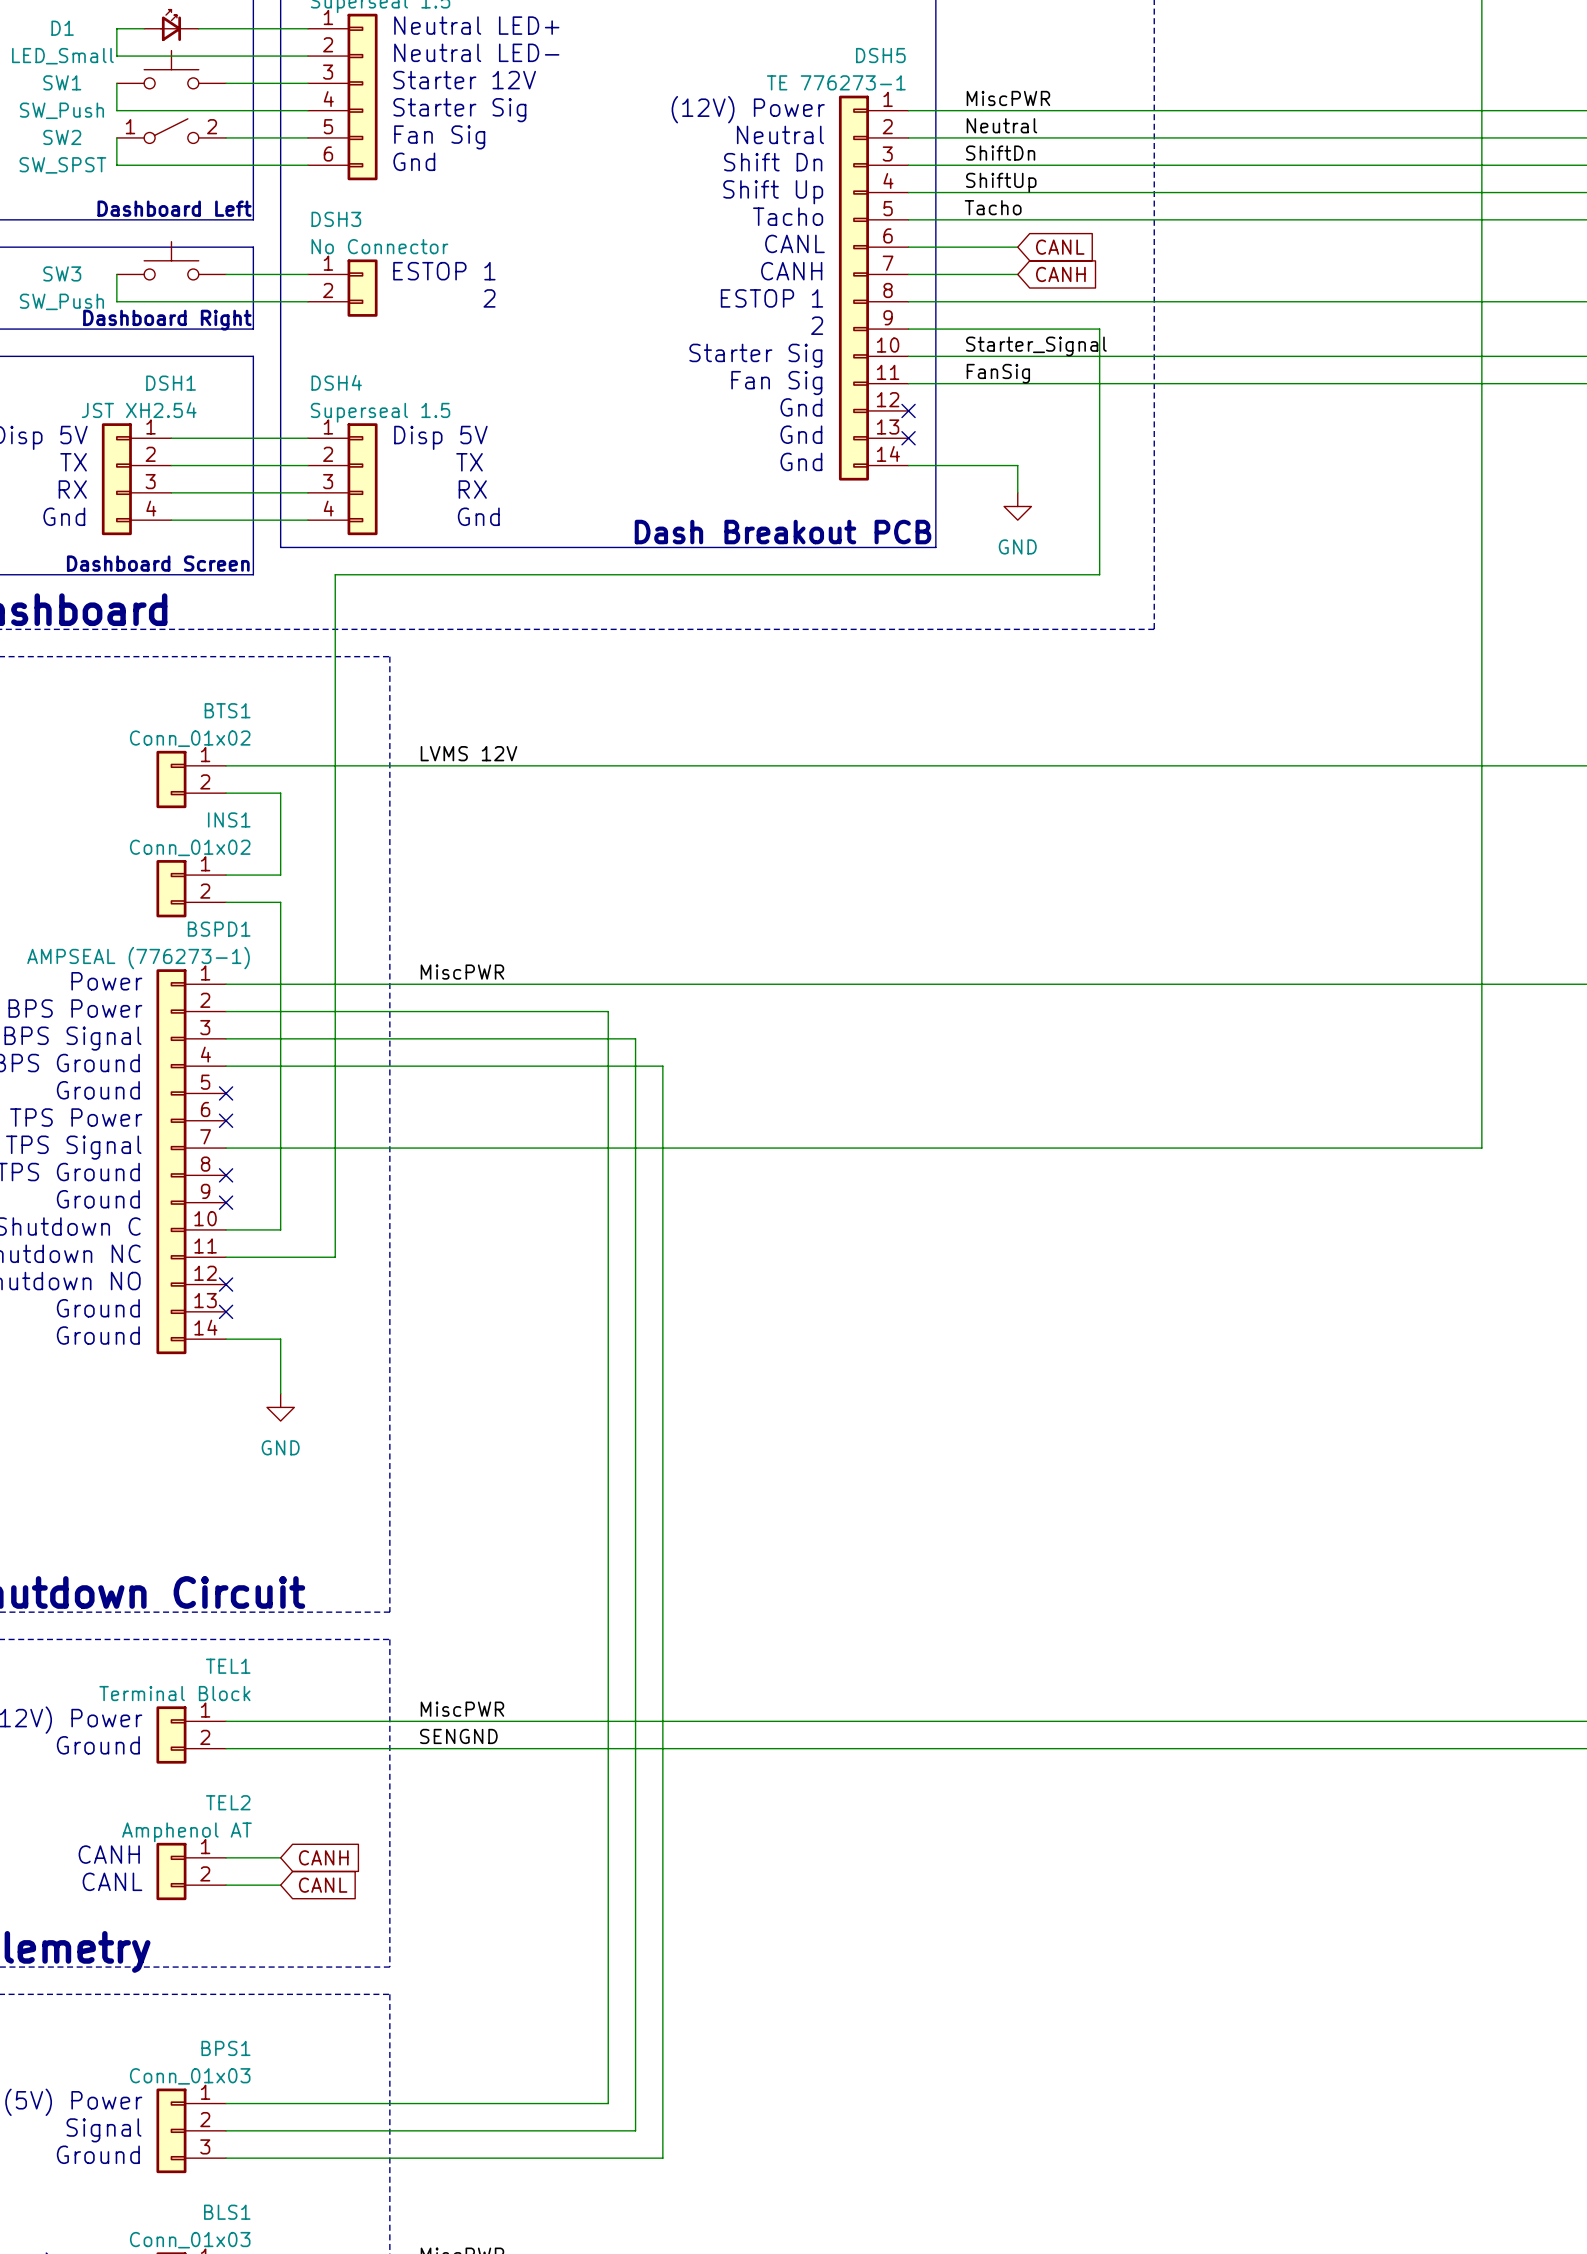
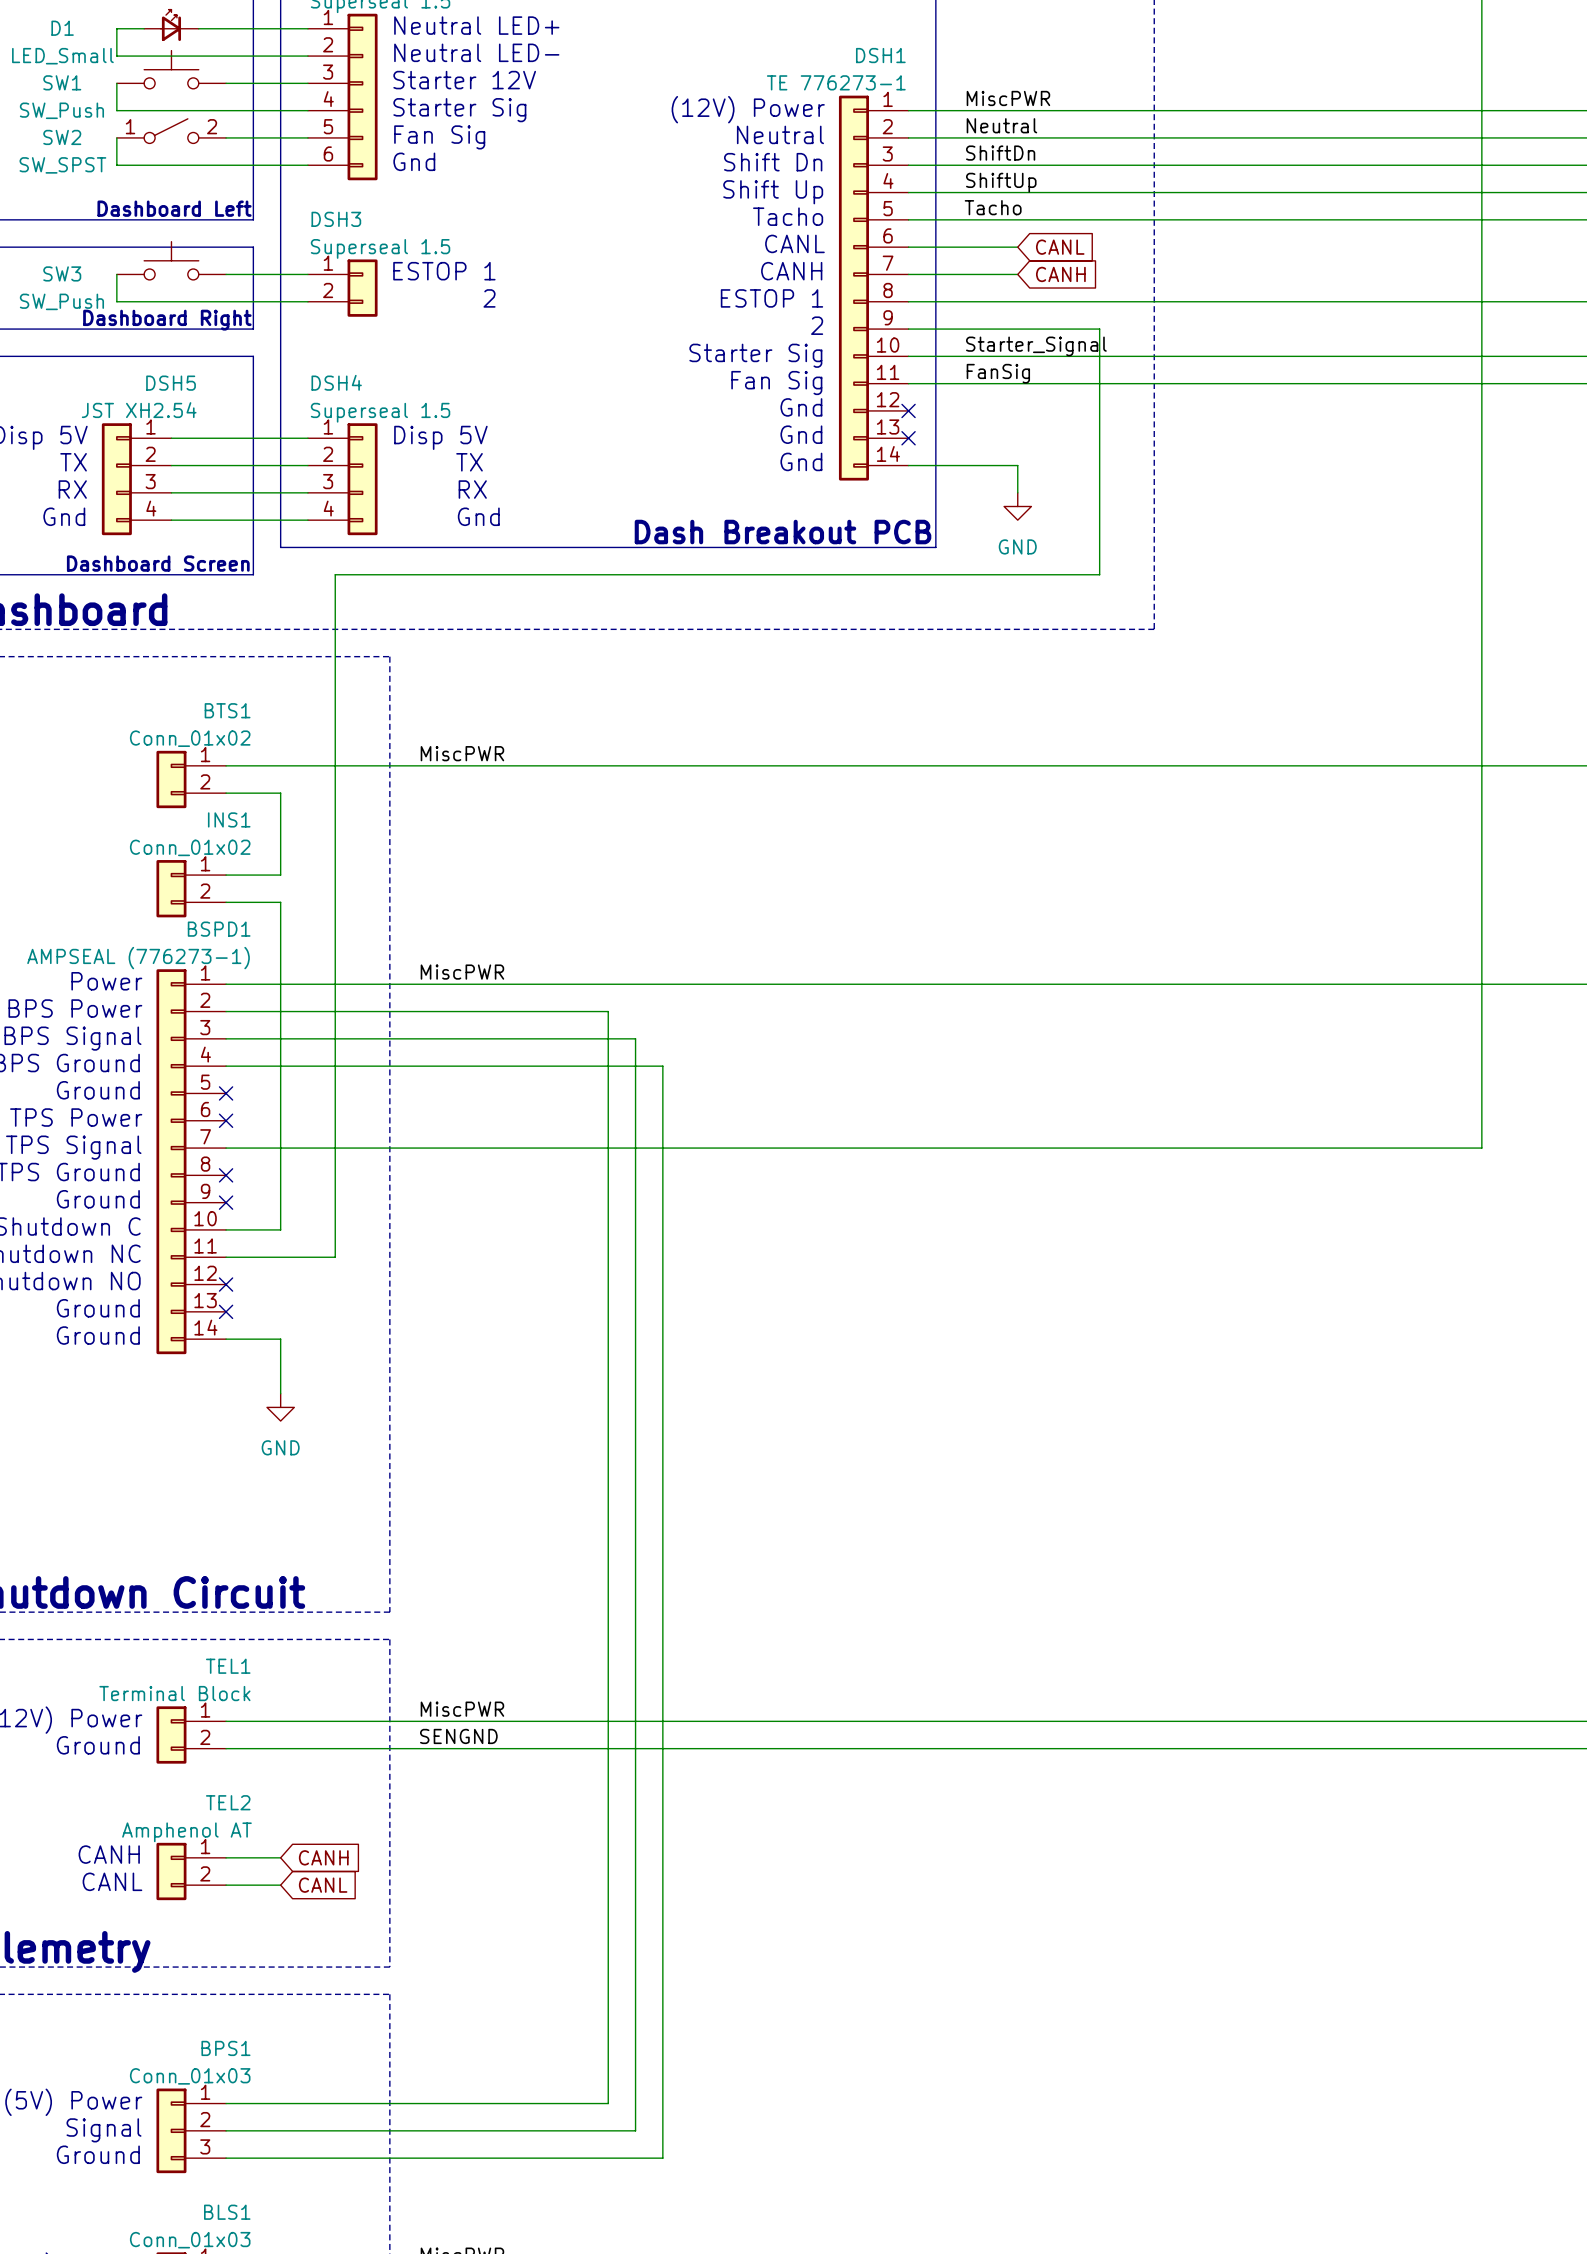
DSH5 name: DSH5 (880, 55) -> DSH1 (880, 55)
DSH3 value: No Connector (379, 246) -> Superseal 1.5 (380, 248)
DSH1 name: DSH1 (171, 383) -> DSH5 (171, 383)
label: LVMS 12V (468, 753) -> MiscPWR (462, 753)

